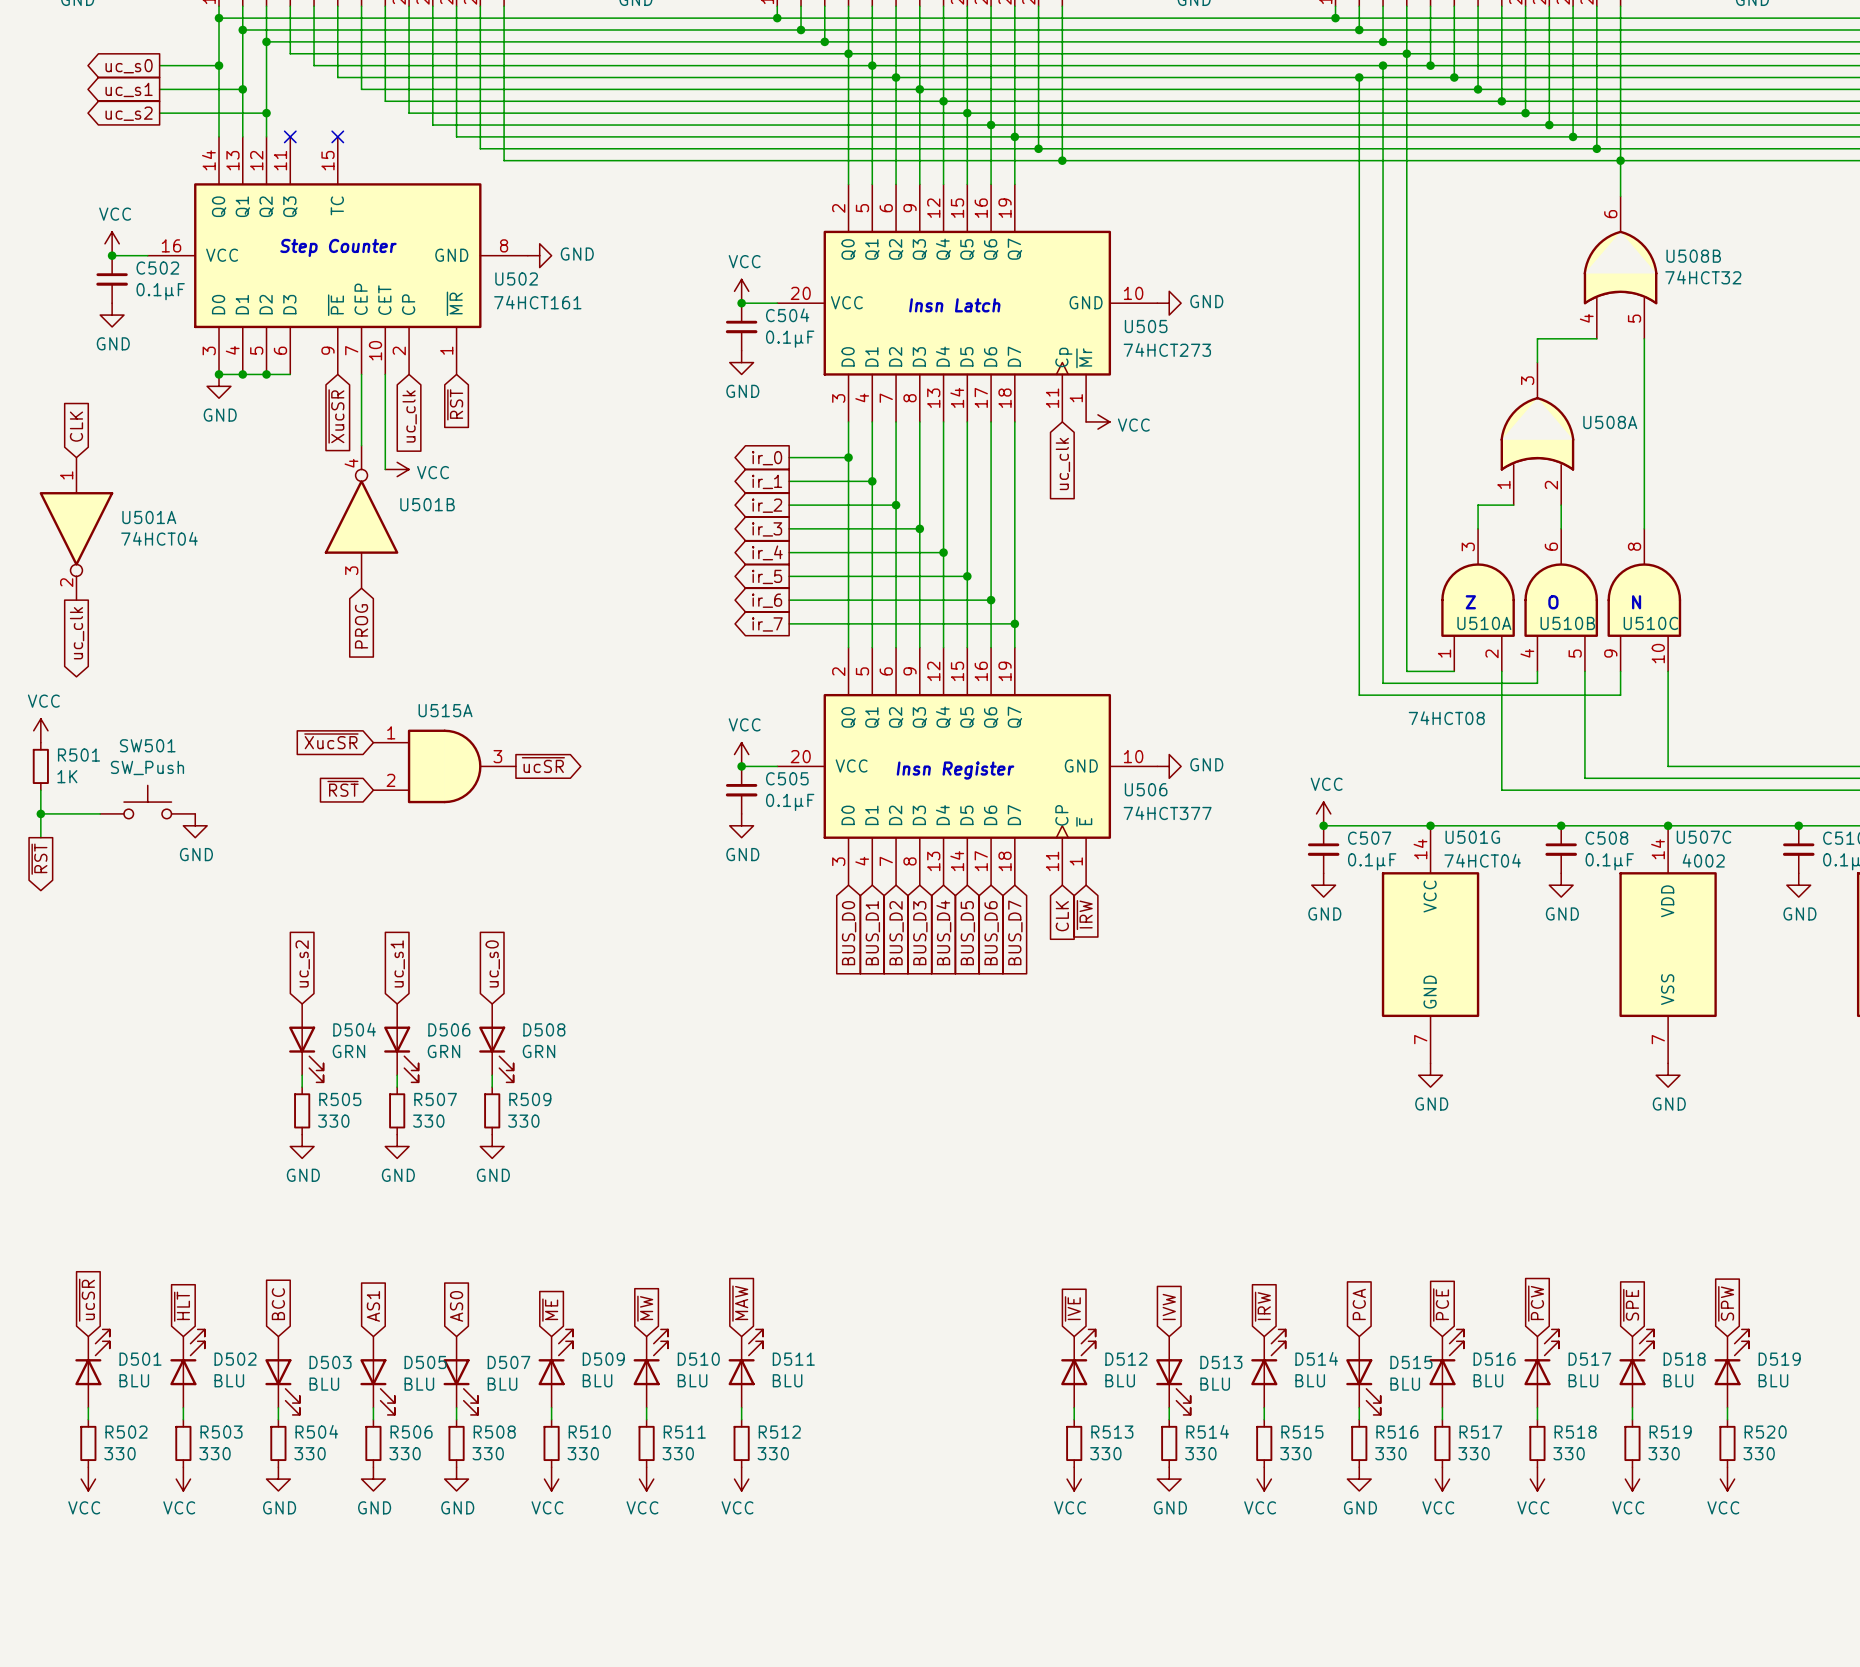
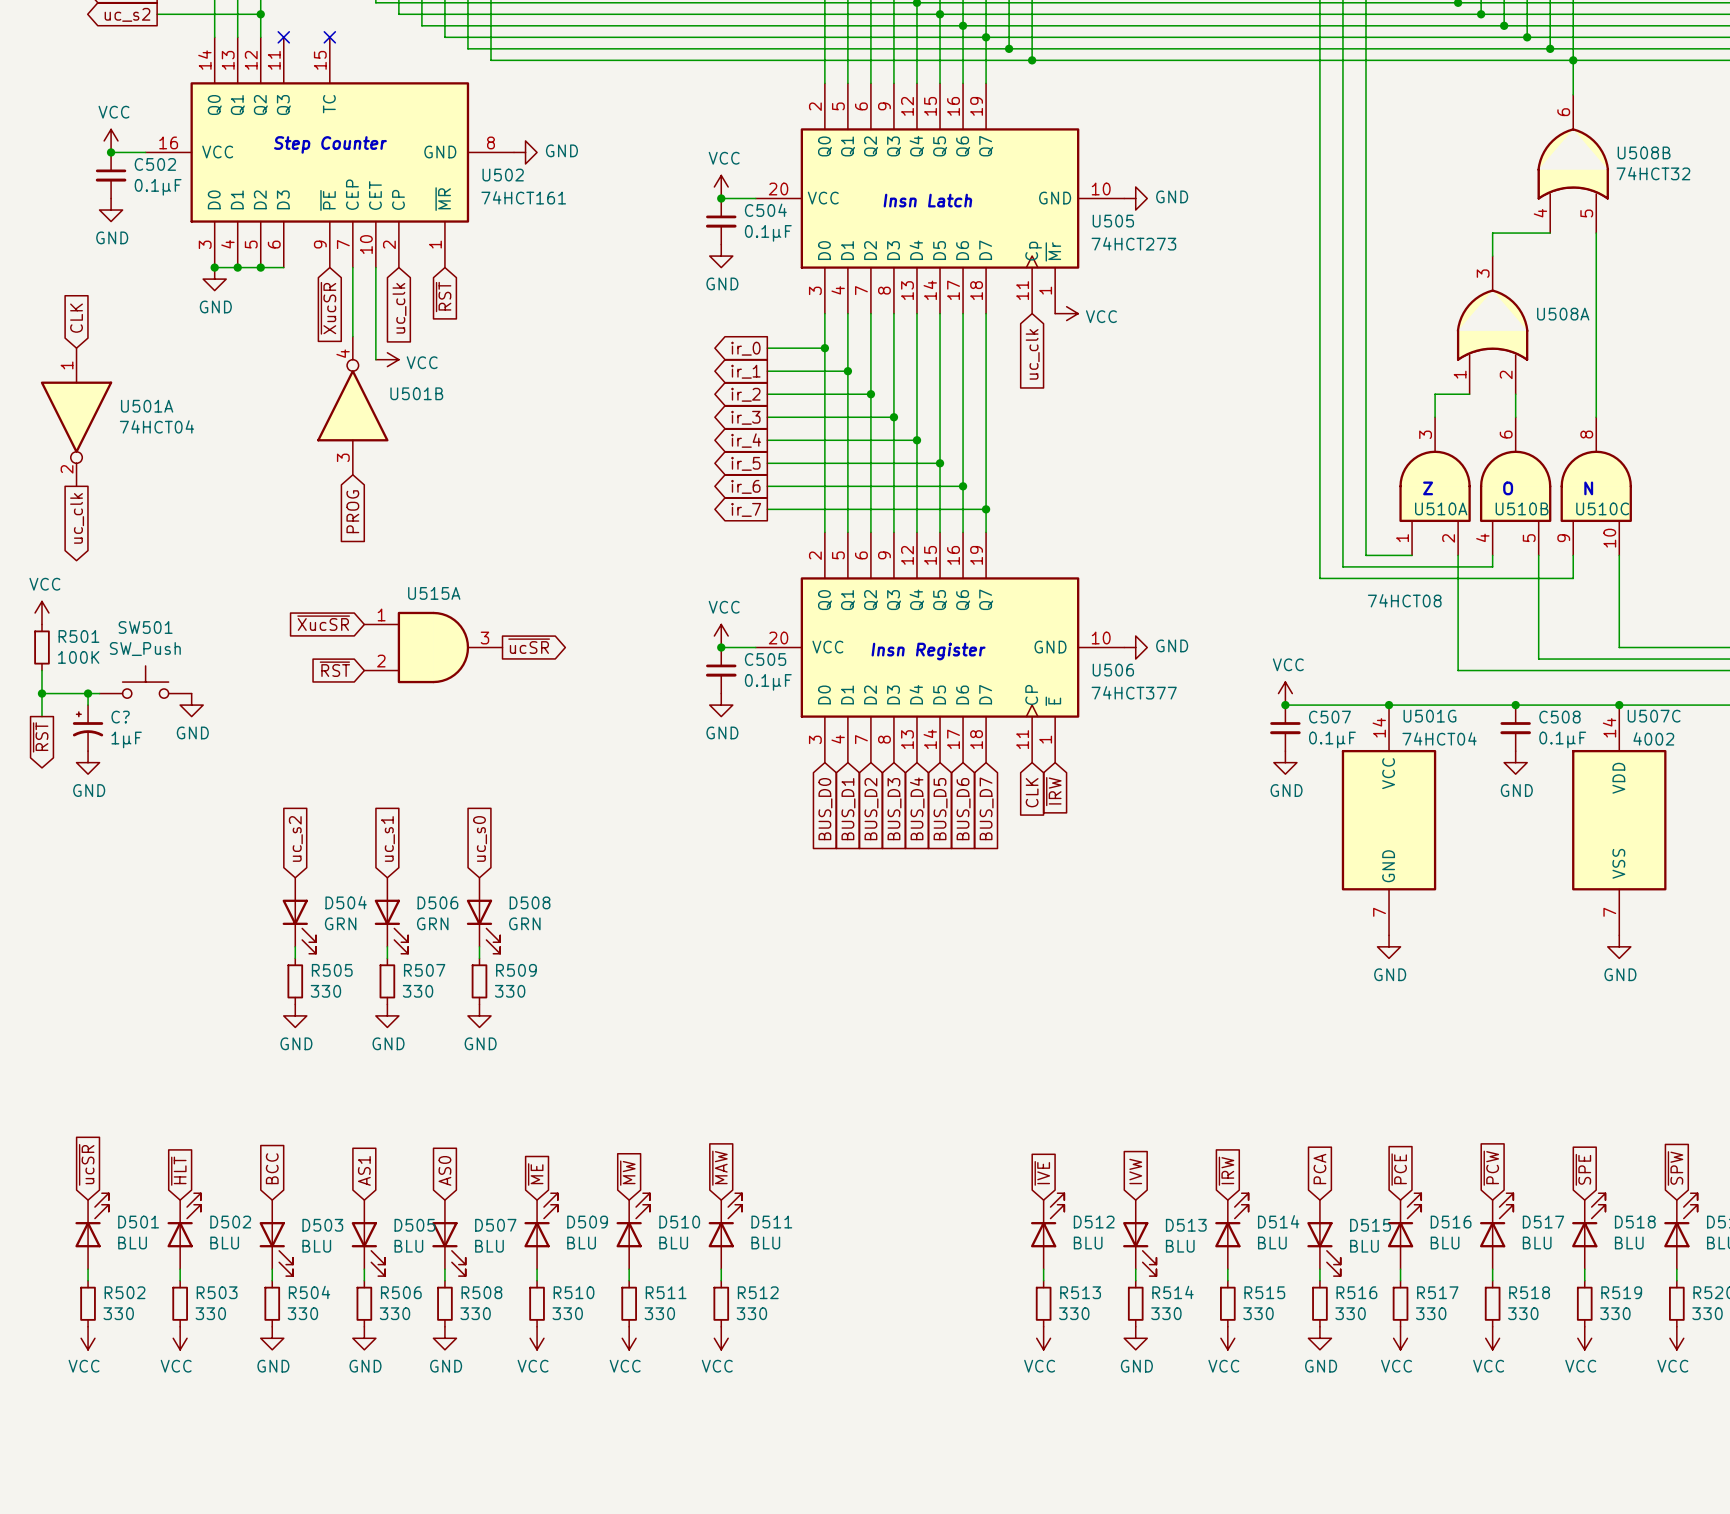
R501 value: 1K (67, 776) -> 100K (78, 657)
wire: none -> (88, 693) (88, 705)
junction: none -> (88, 693)
C?: none -> 1µF (88, 728)
power symbol: none -> GND (88, 762)

